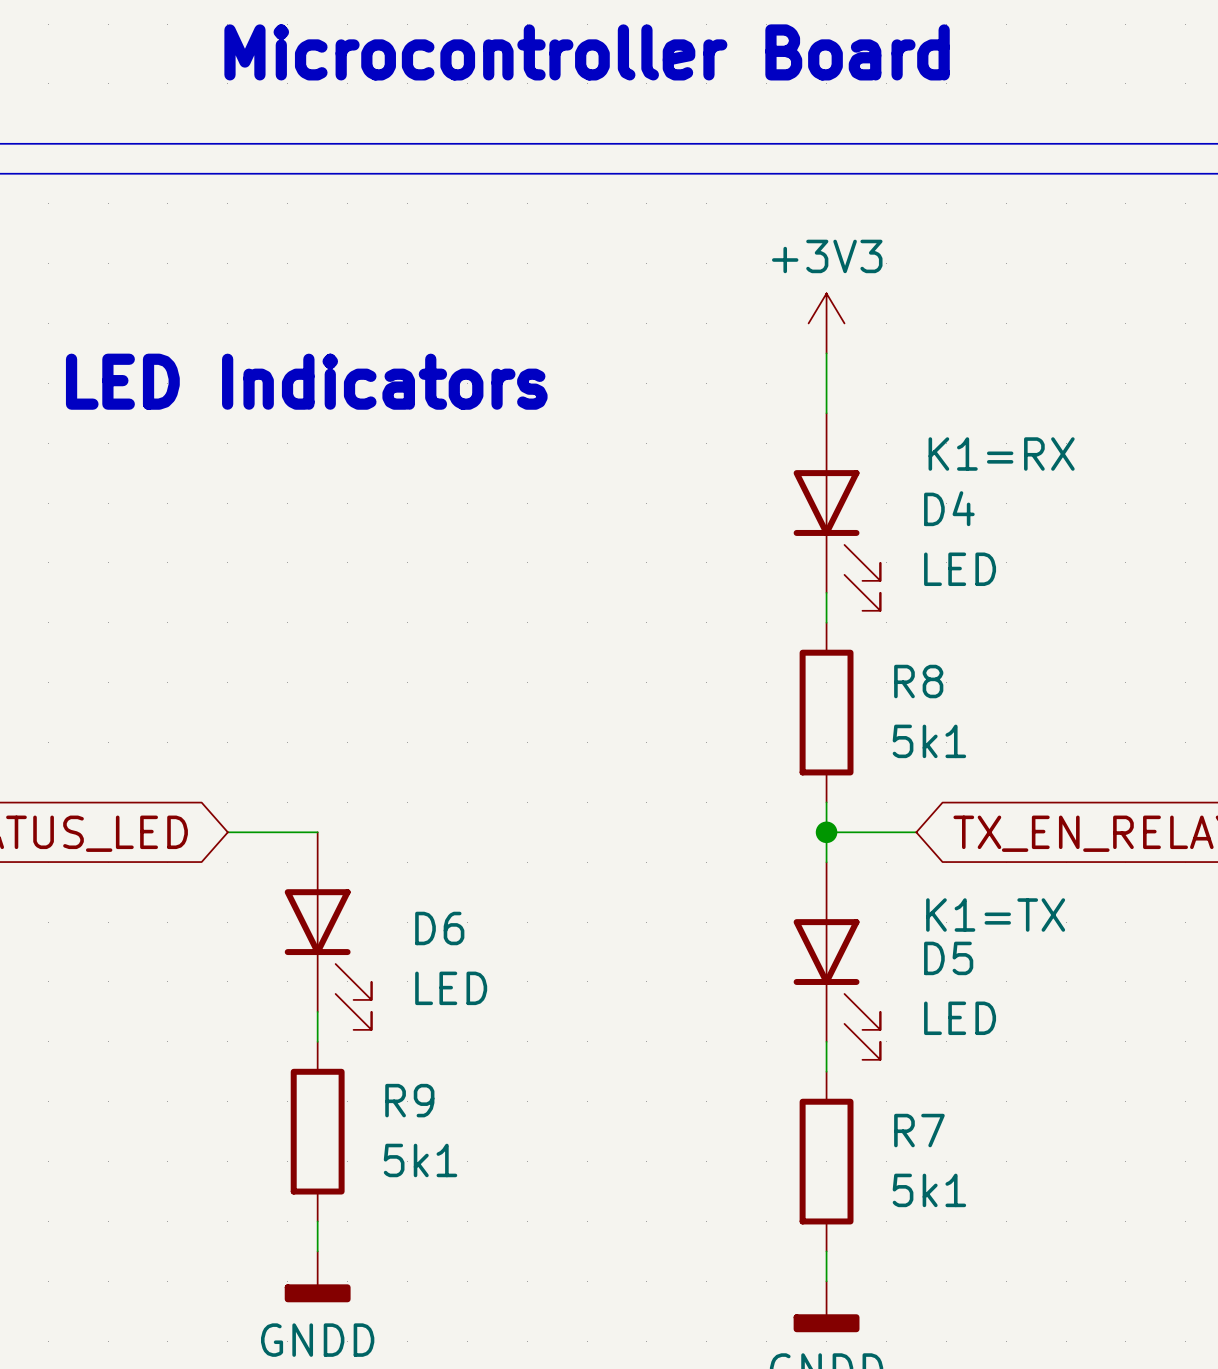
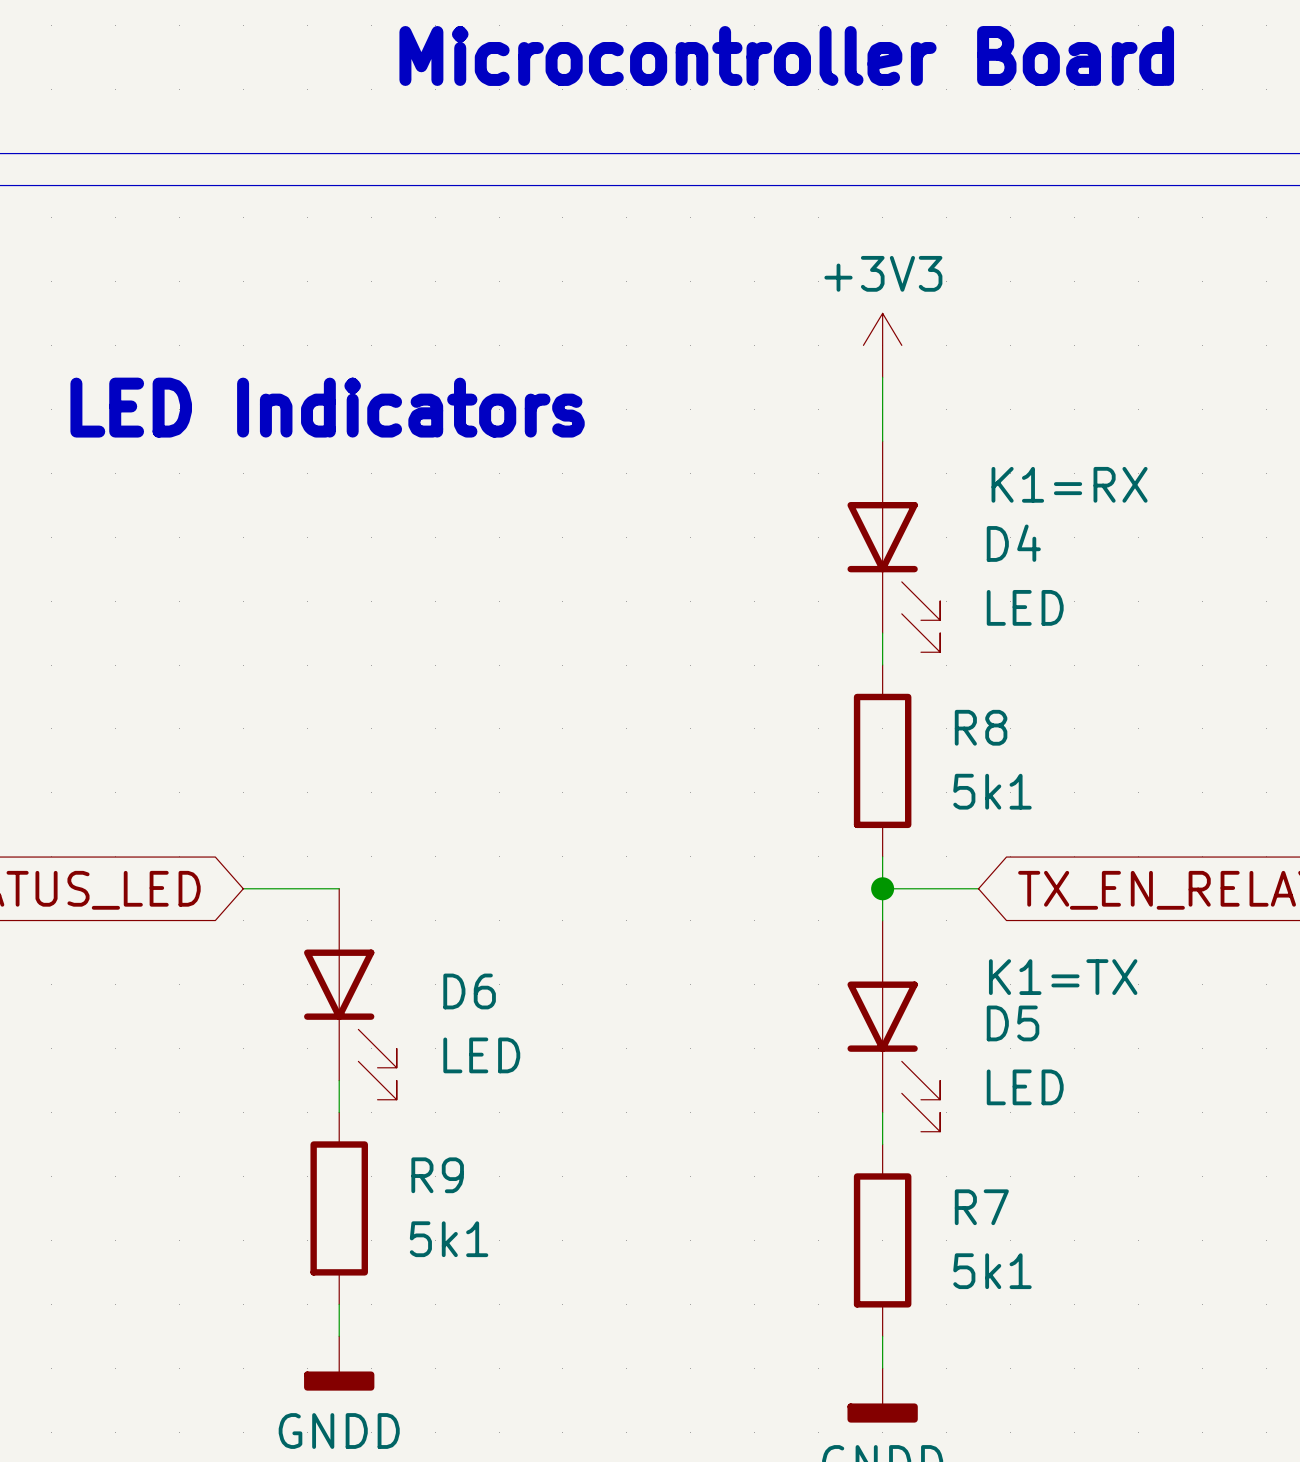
text position: Microcontroller Board (587, 52) -> Microcontroller Board (786, 55)

